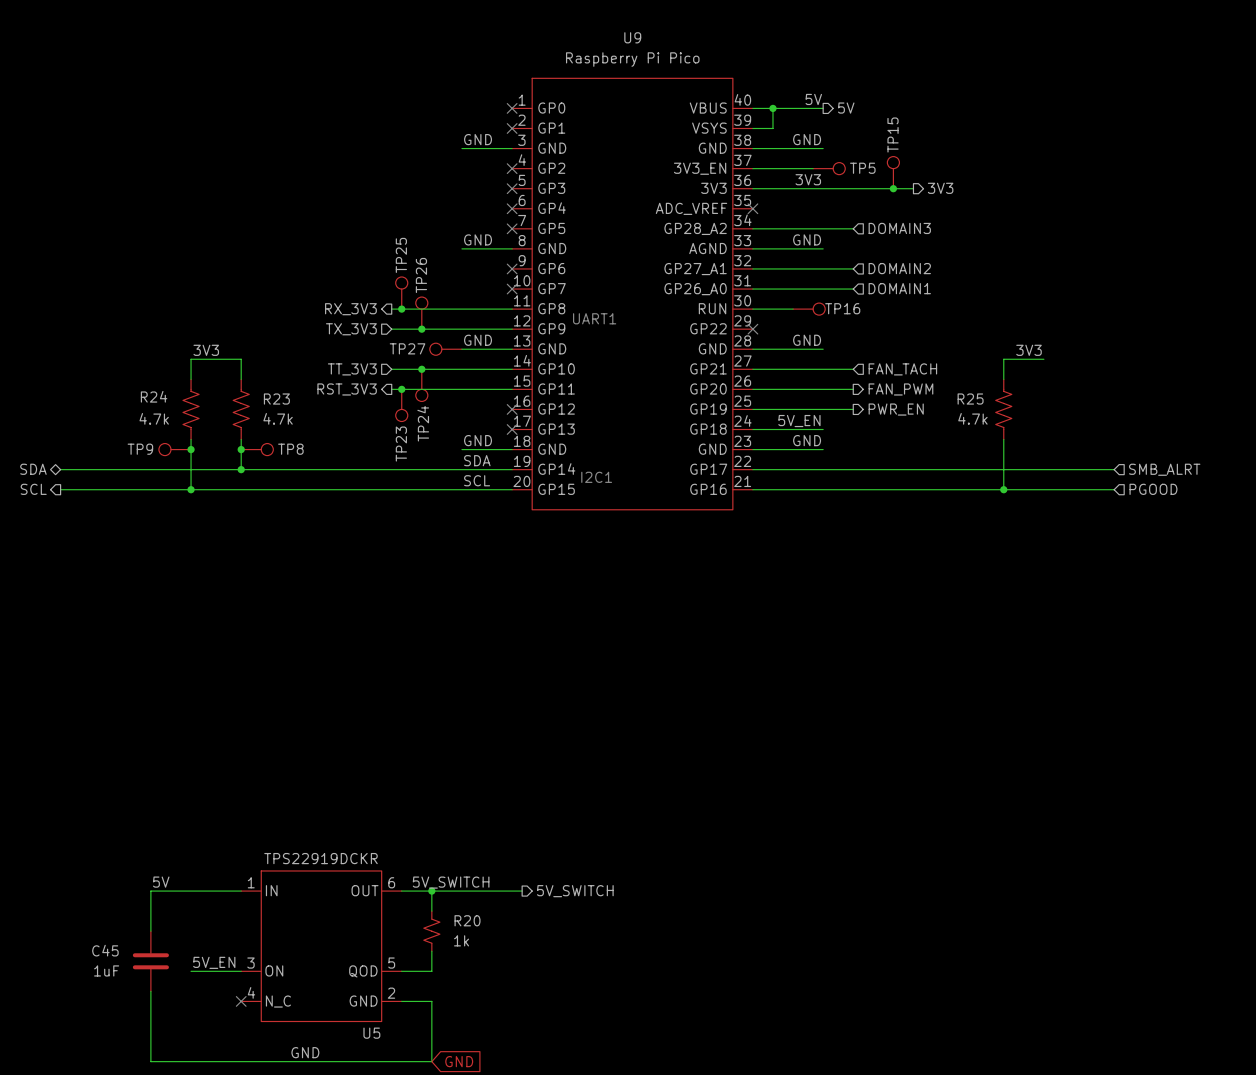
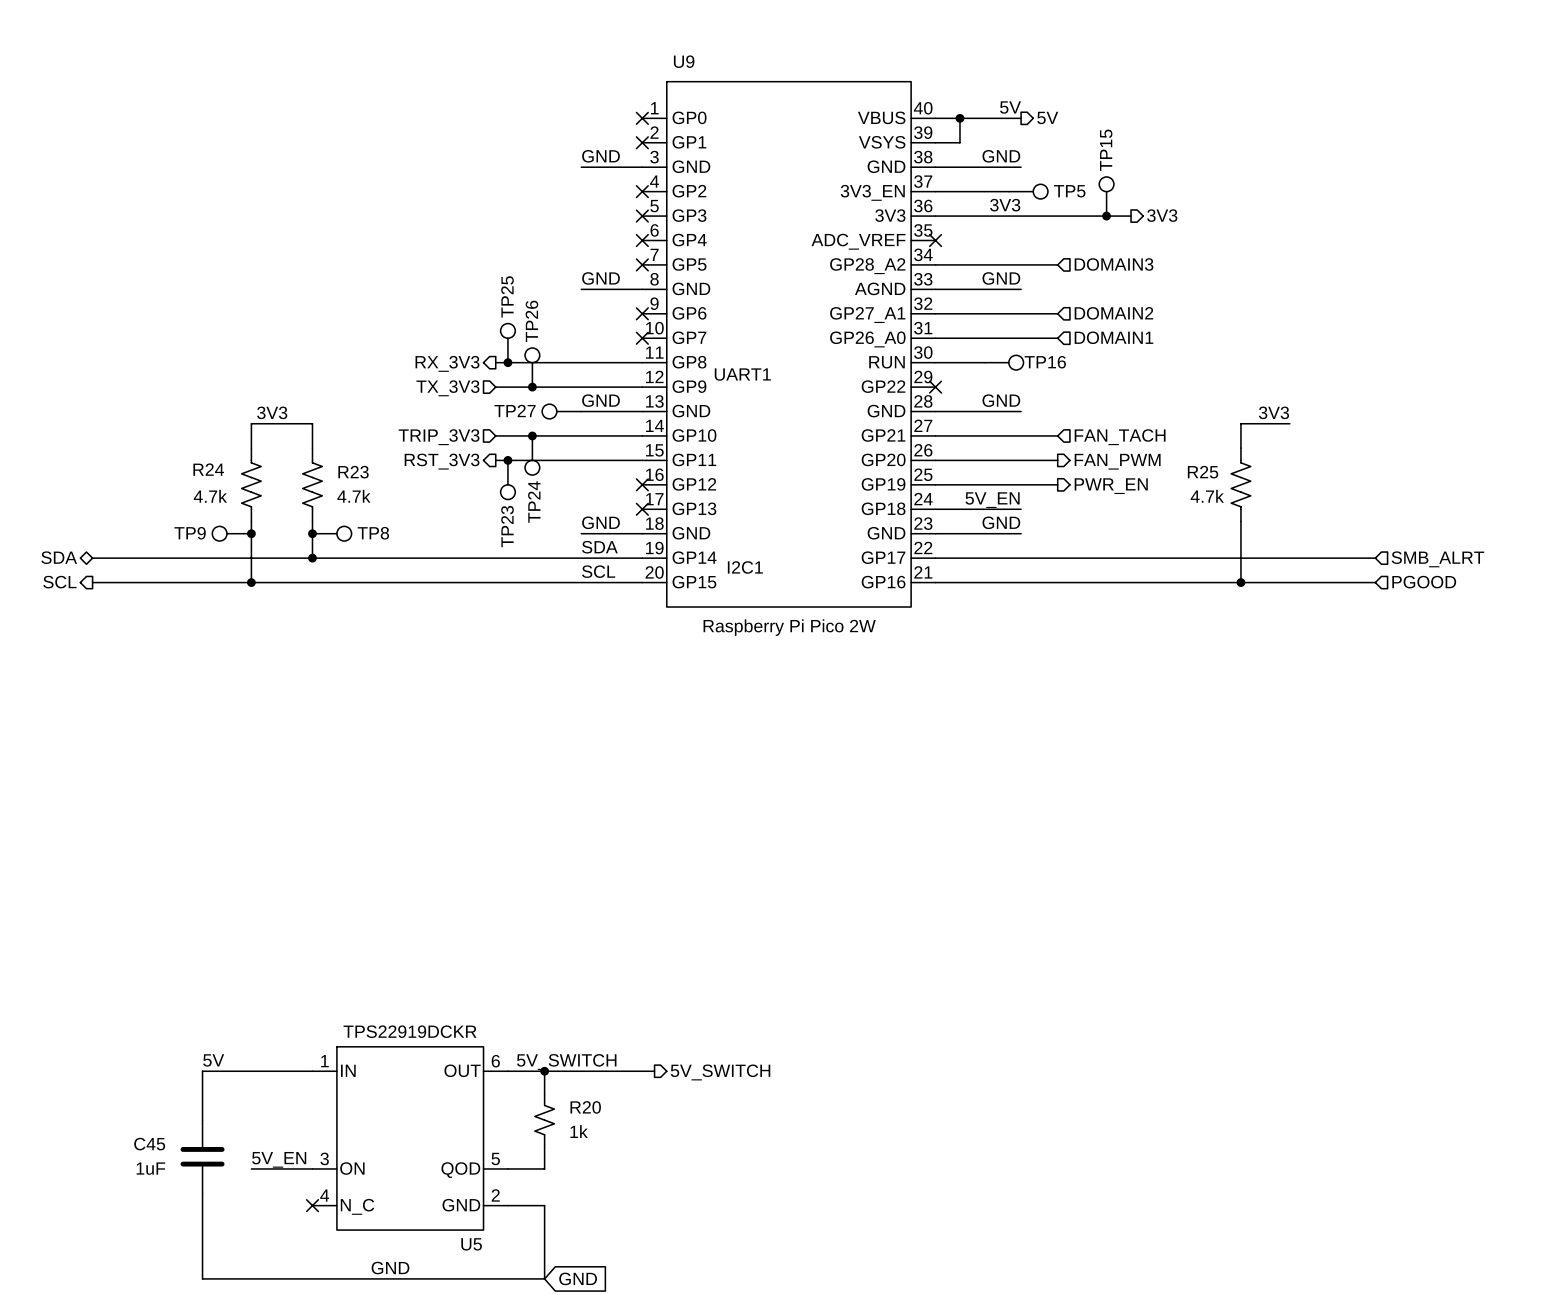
U9 name position: U9 (632, 37) -> U9 (684, 61)
U9 value: Raspberry Pi Pico (632, 59) -> Raspberry Pi Pico 2W (789, 627)
hierarchical label: TT_3V3 (352, 369) -> TRIP_3V3 (439, 437)

